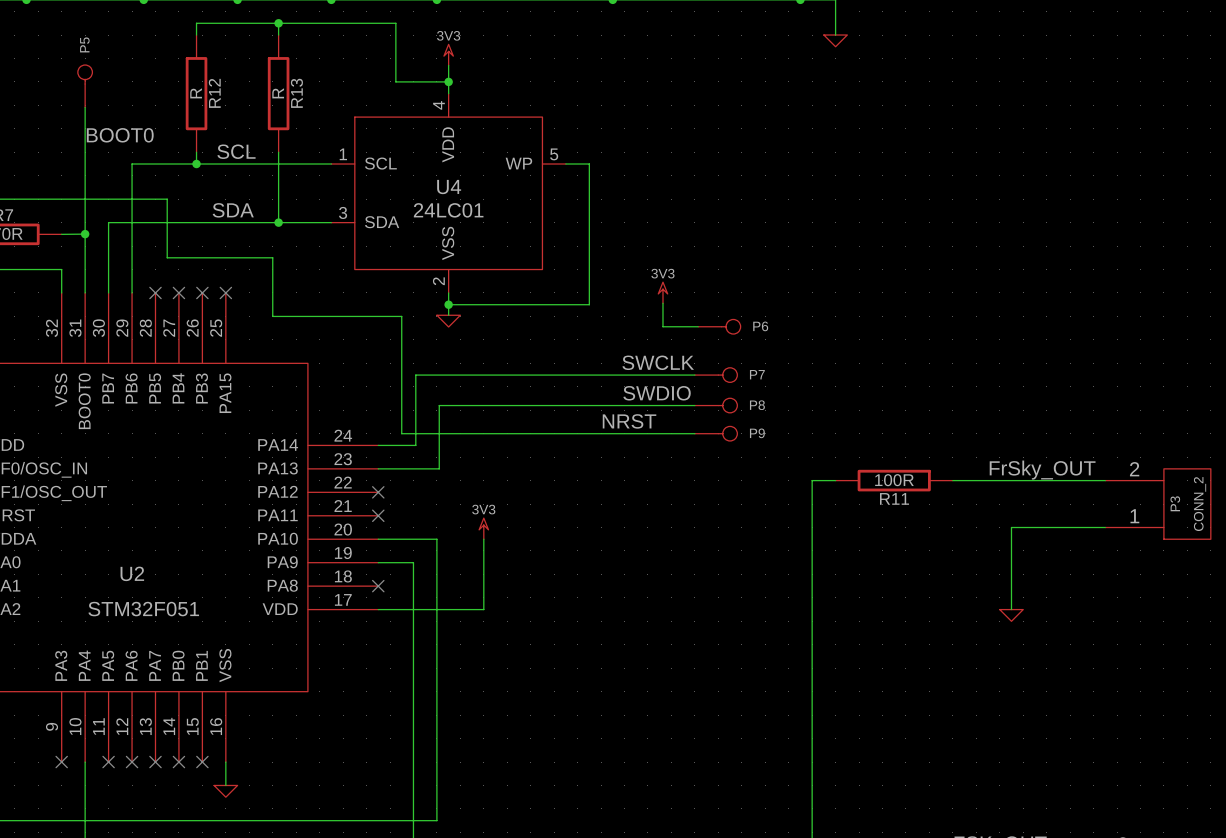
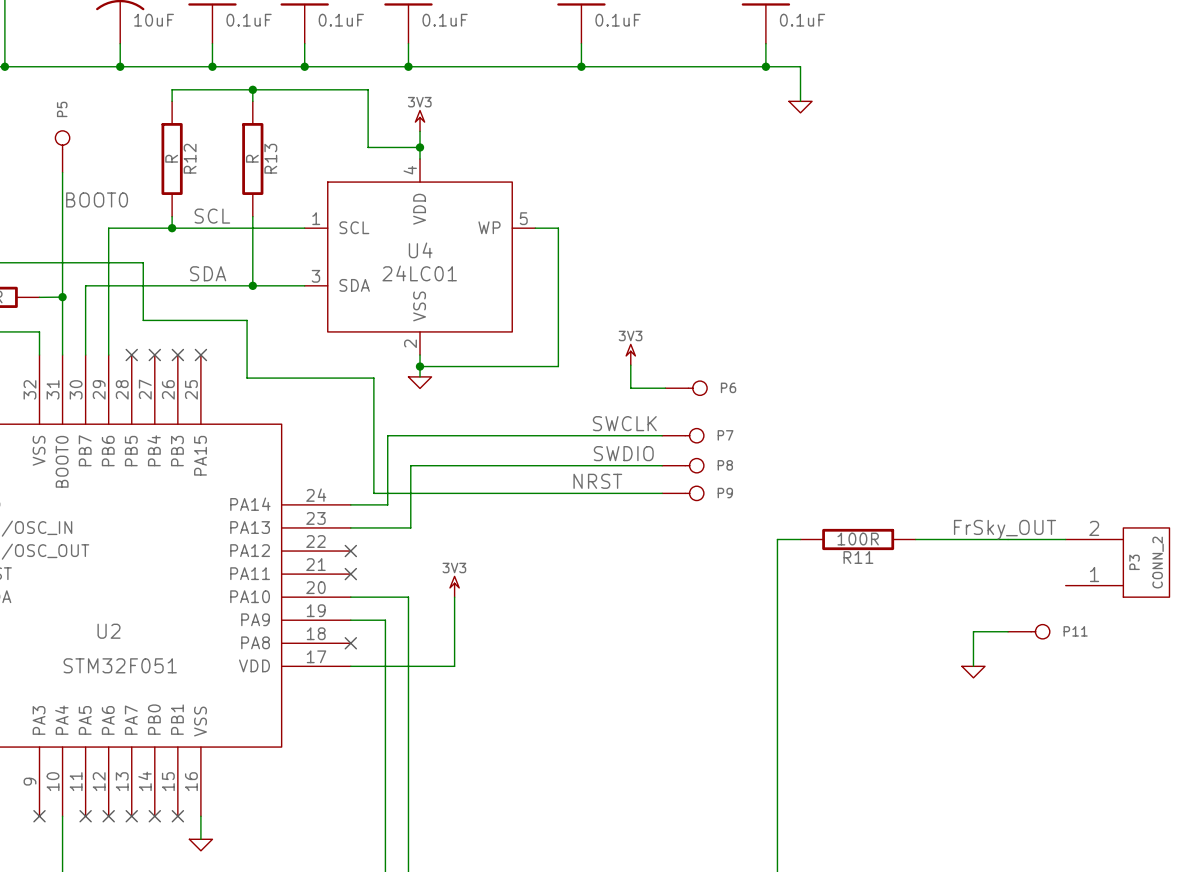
wire: (1105, 527) (1011, 527) (1011, 574) -> (1008, 631) (973, 631)
P11: none -> (1028, 631)

